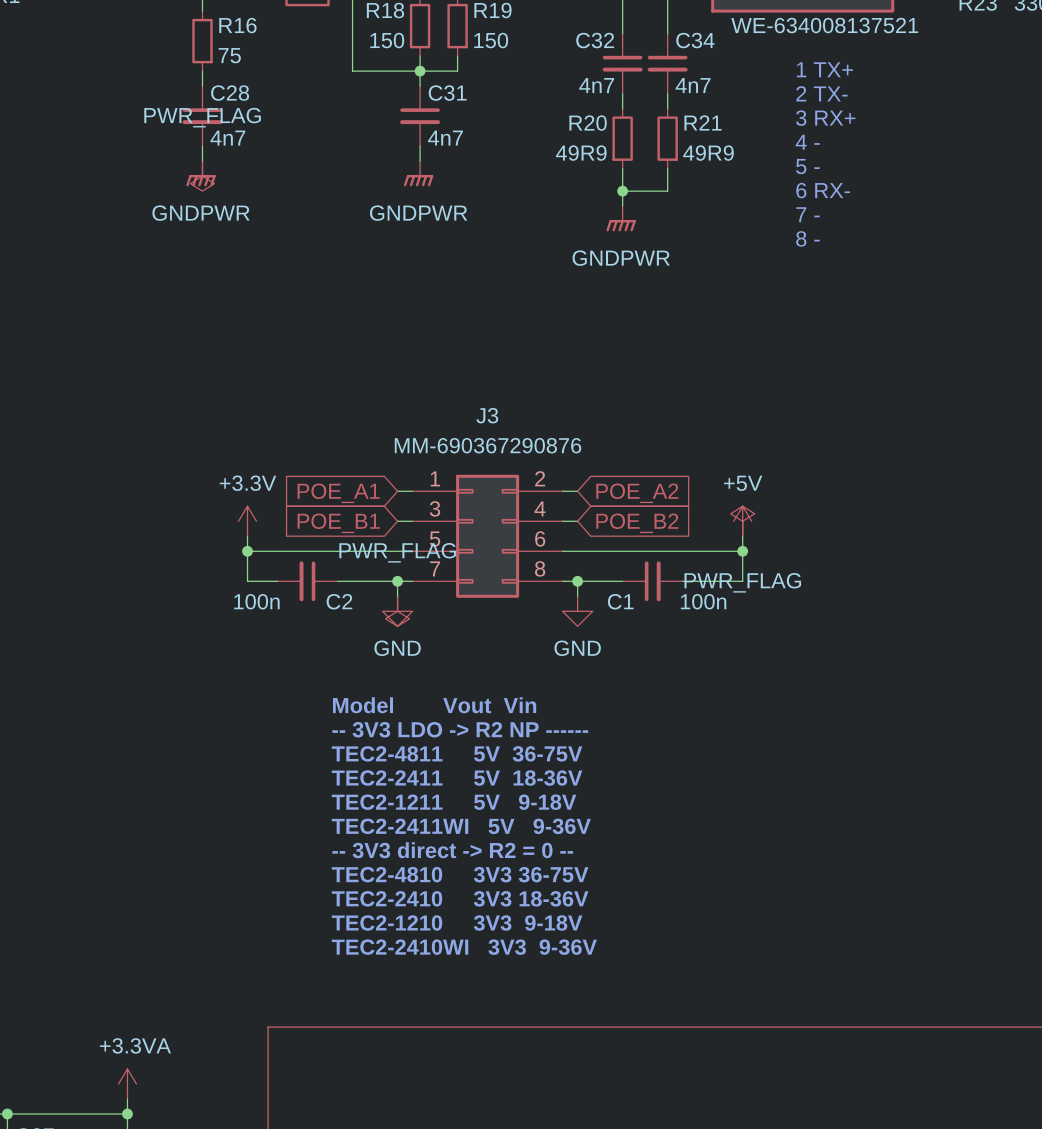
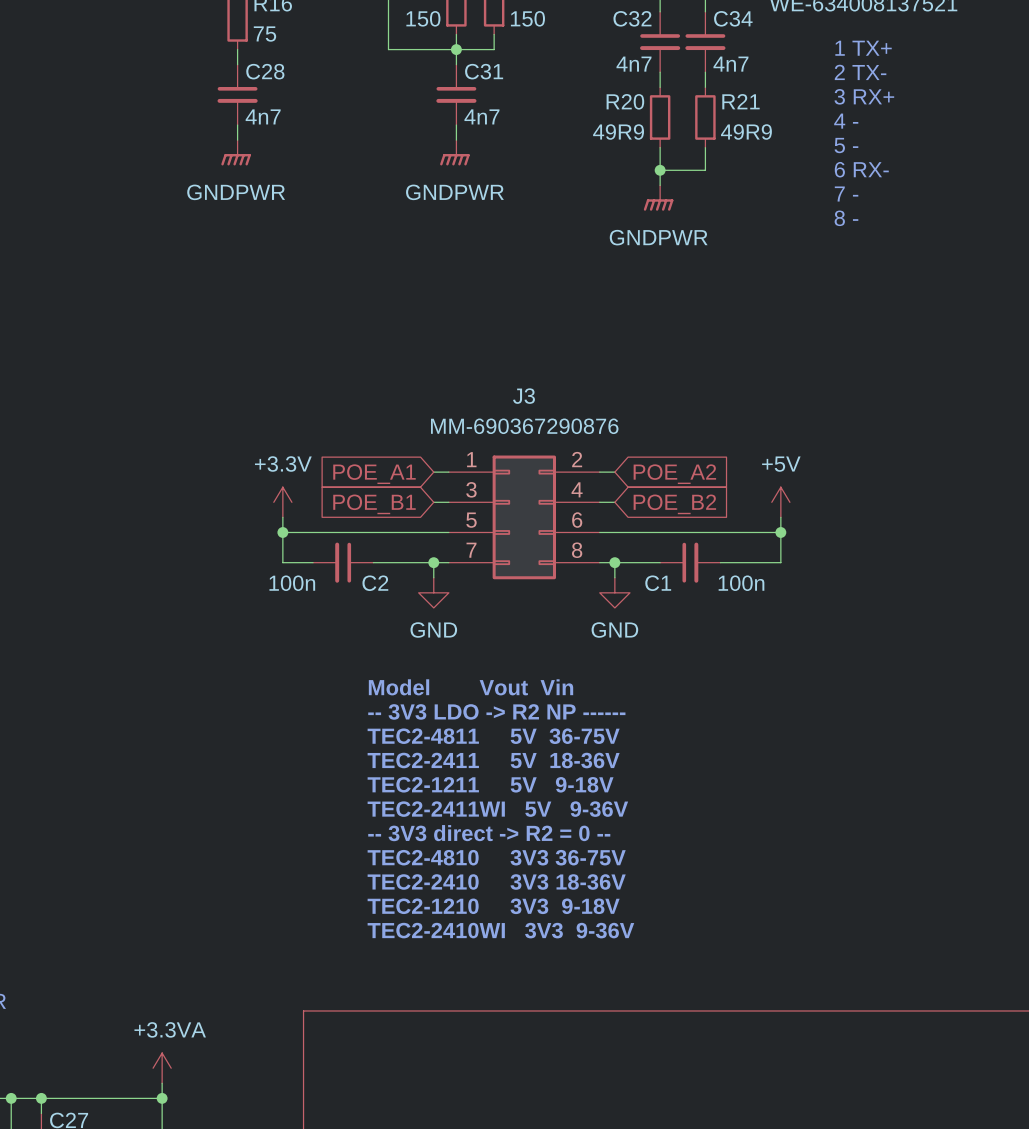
power symbol: PWR_FLAG (202, 176) -> none
power symbol: PWR_FLAG (742, 521) -> none
power symbol: PWR_FLAG (397, 611) -> none

